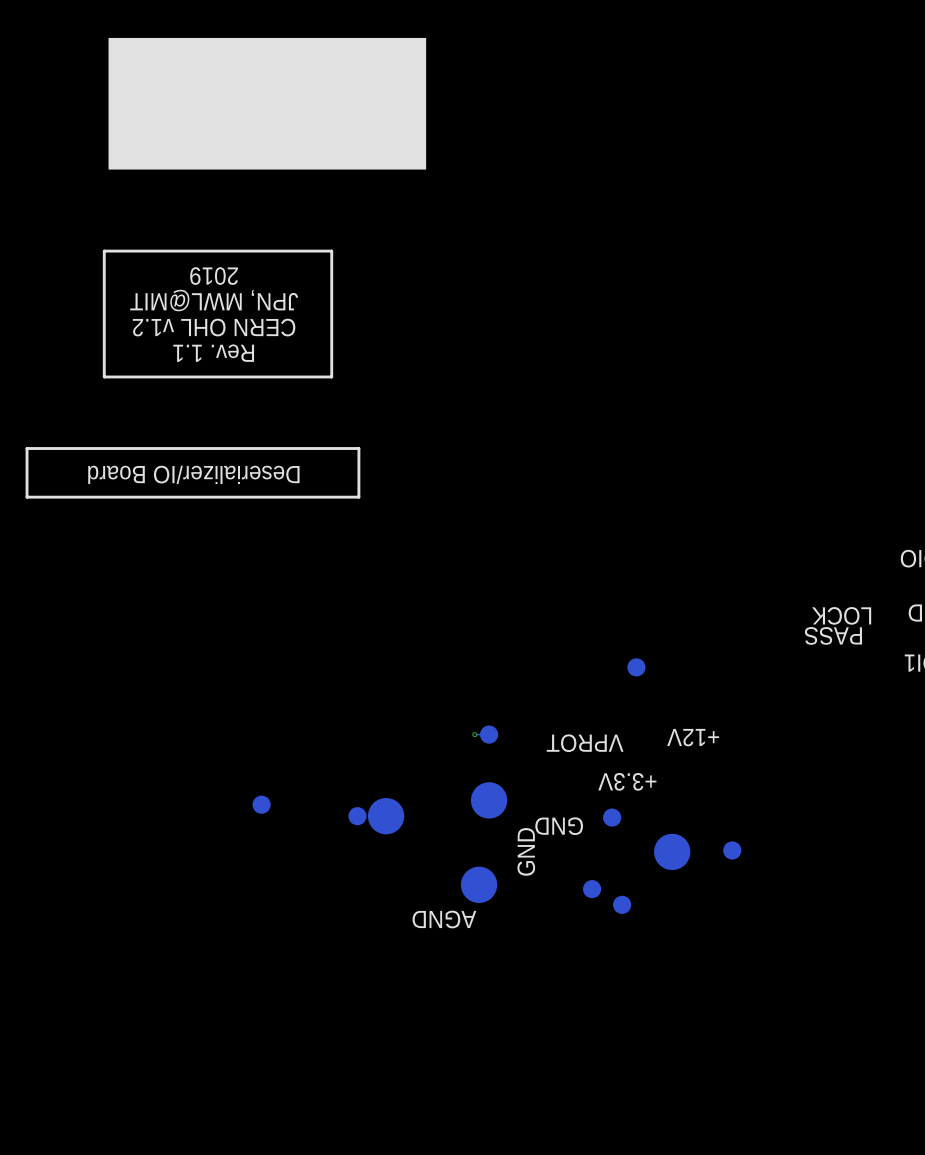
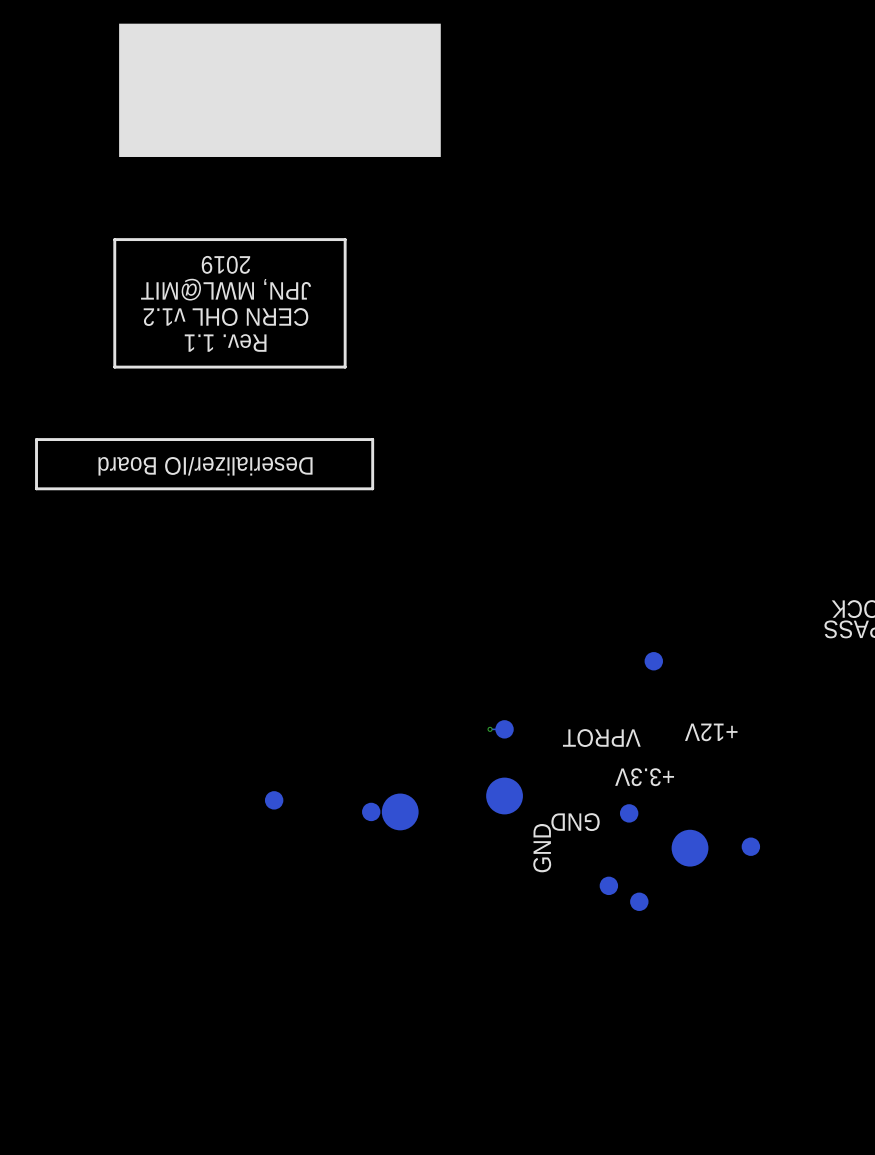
part: (479, 884) -> none
text: AGND (444, 919) -> none

